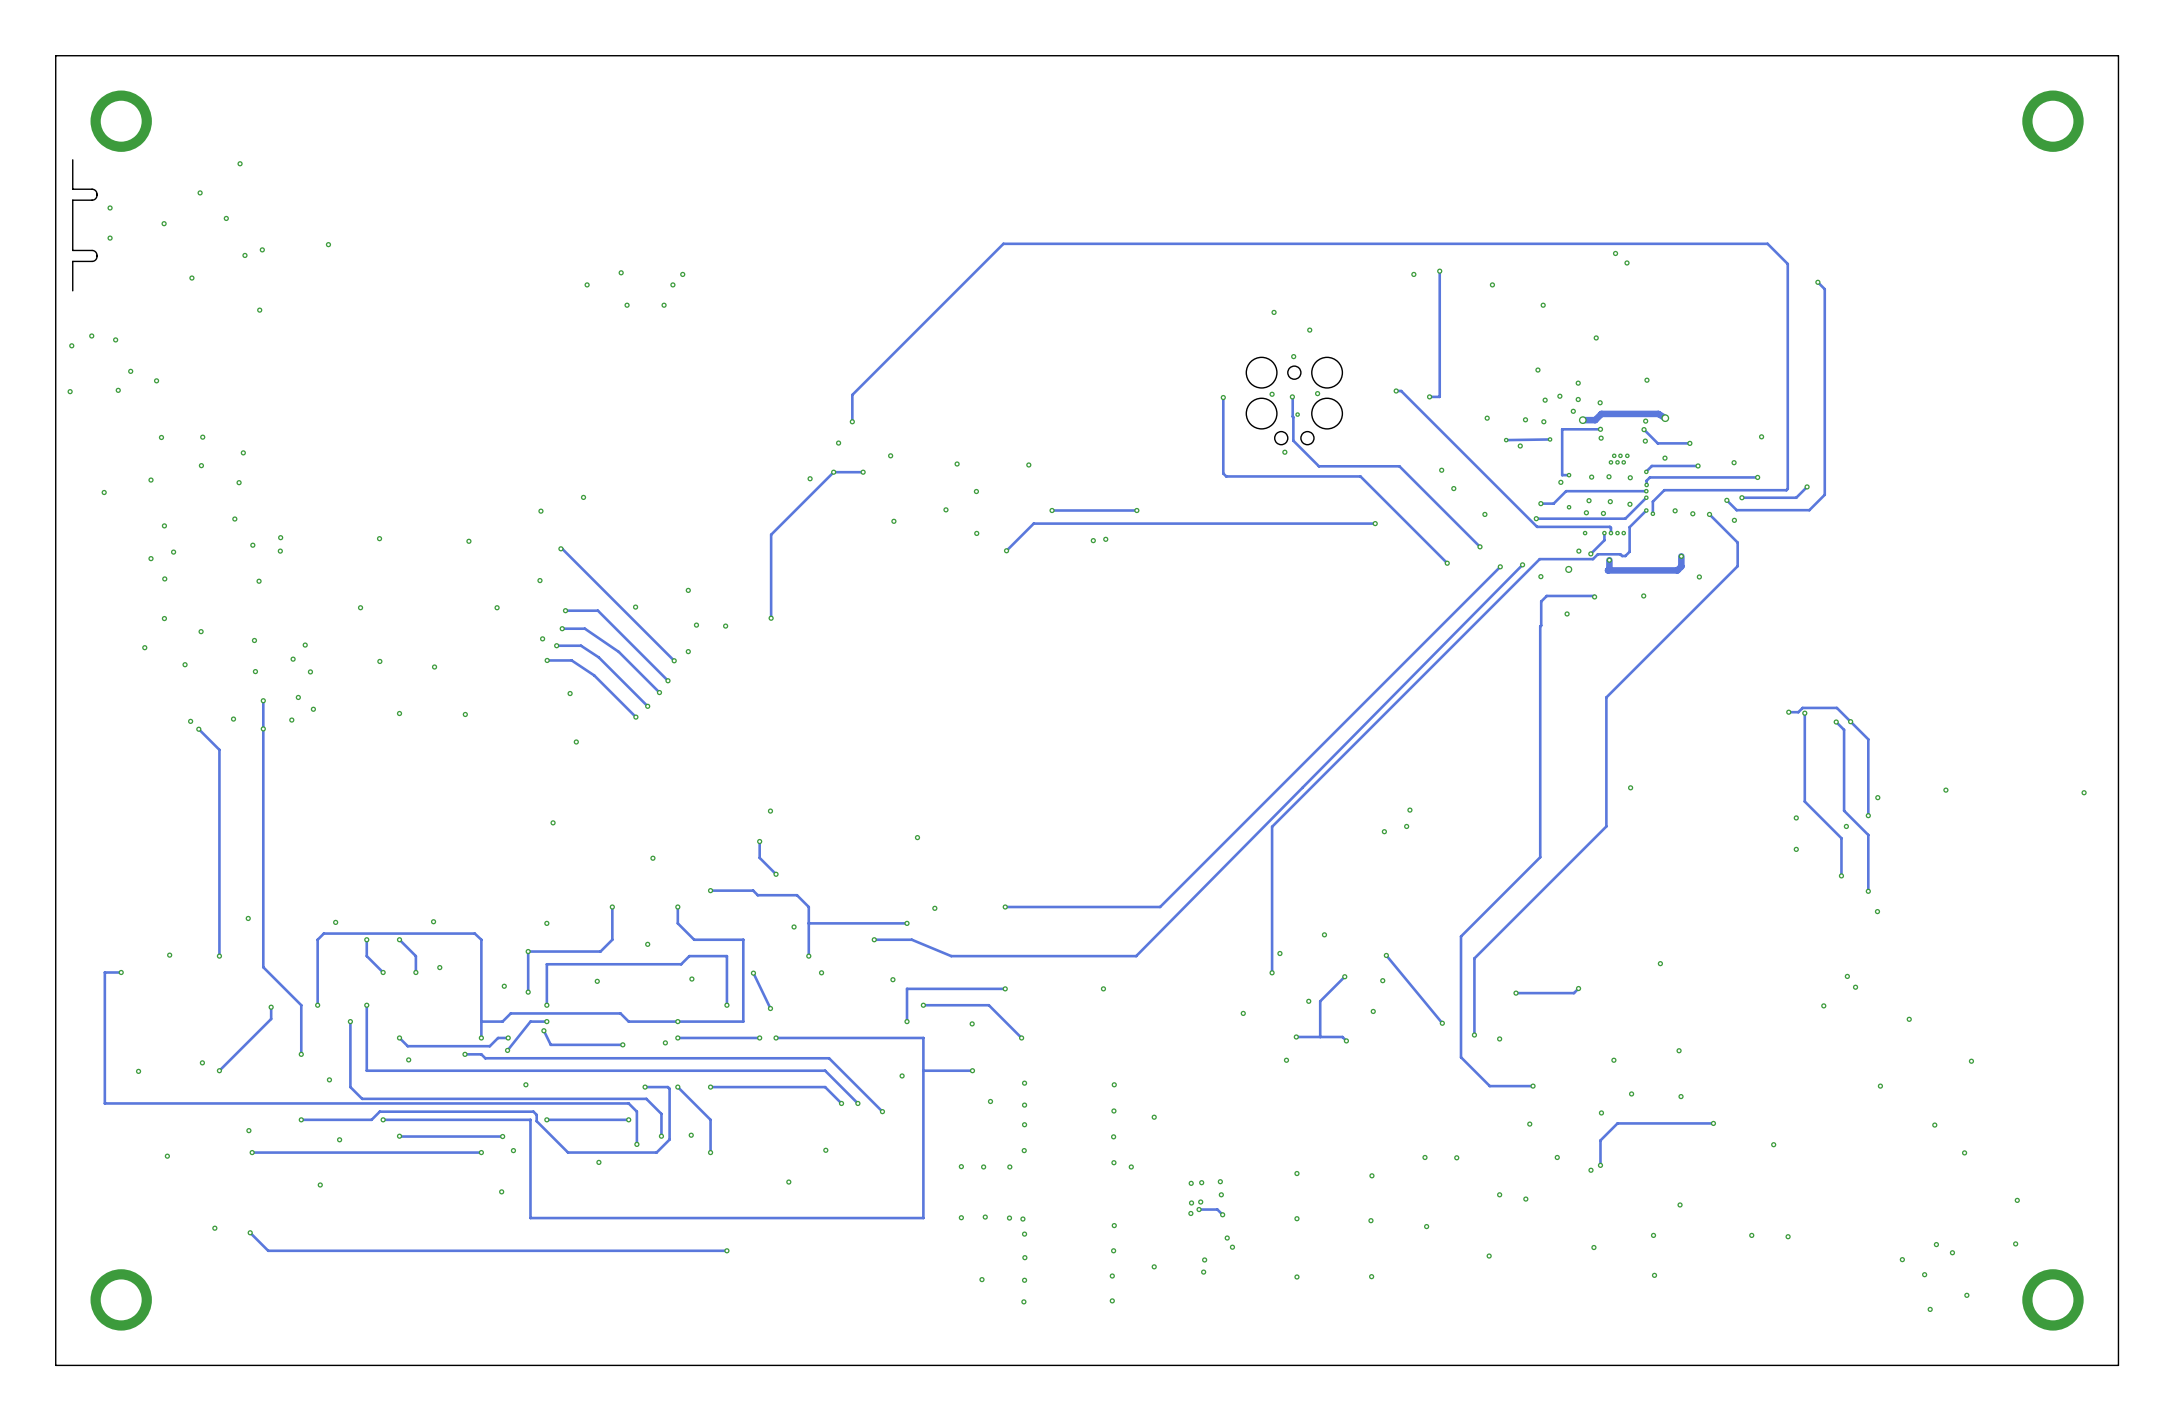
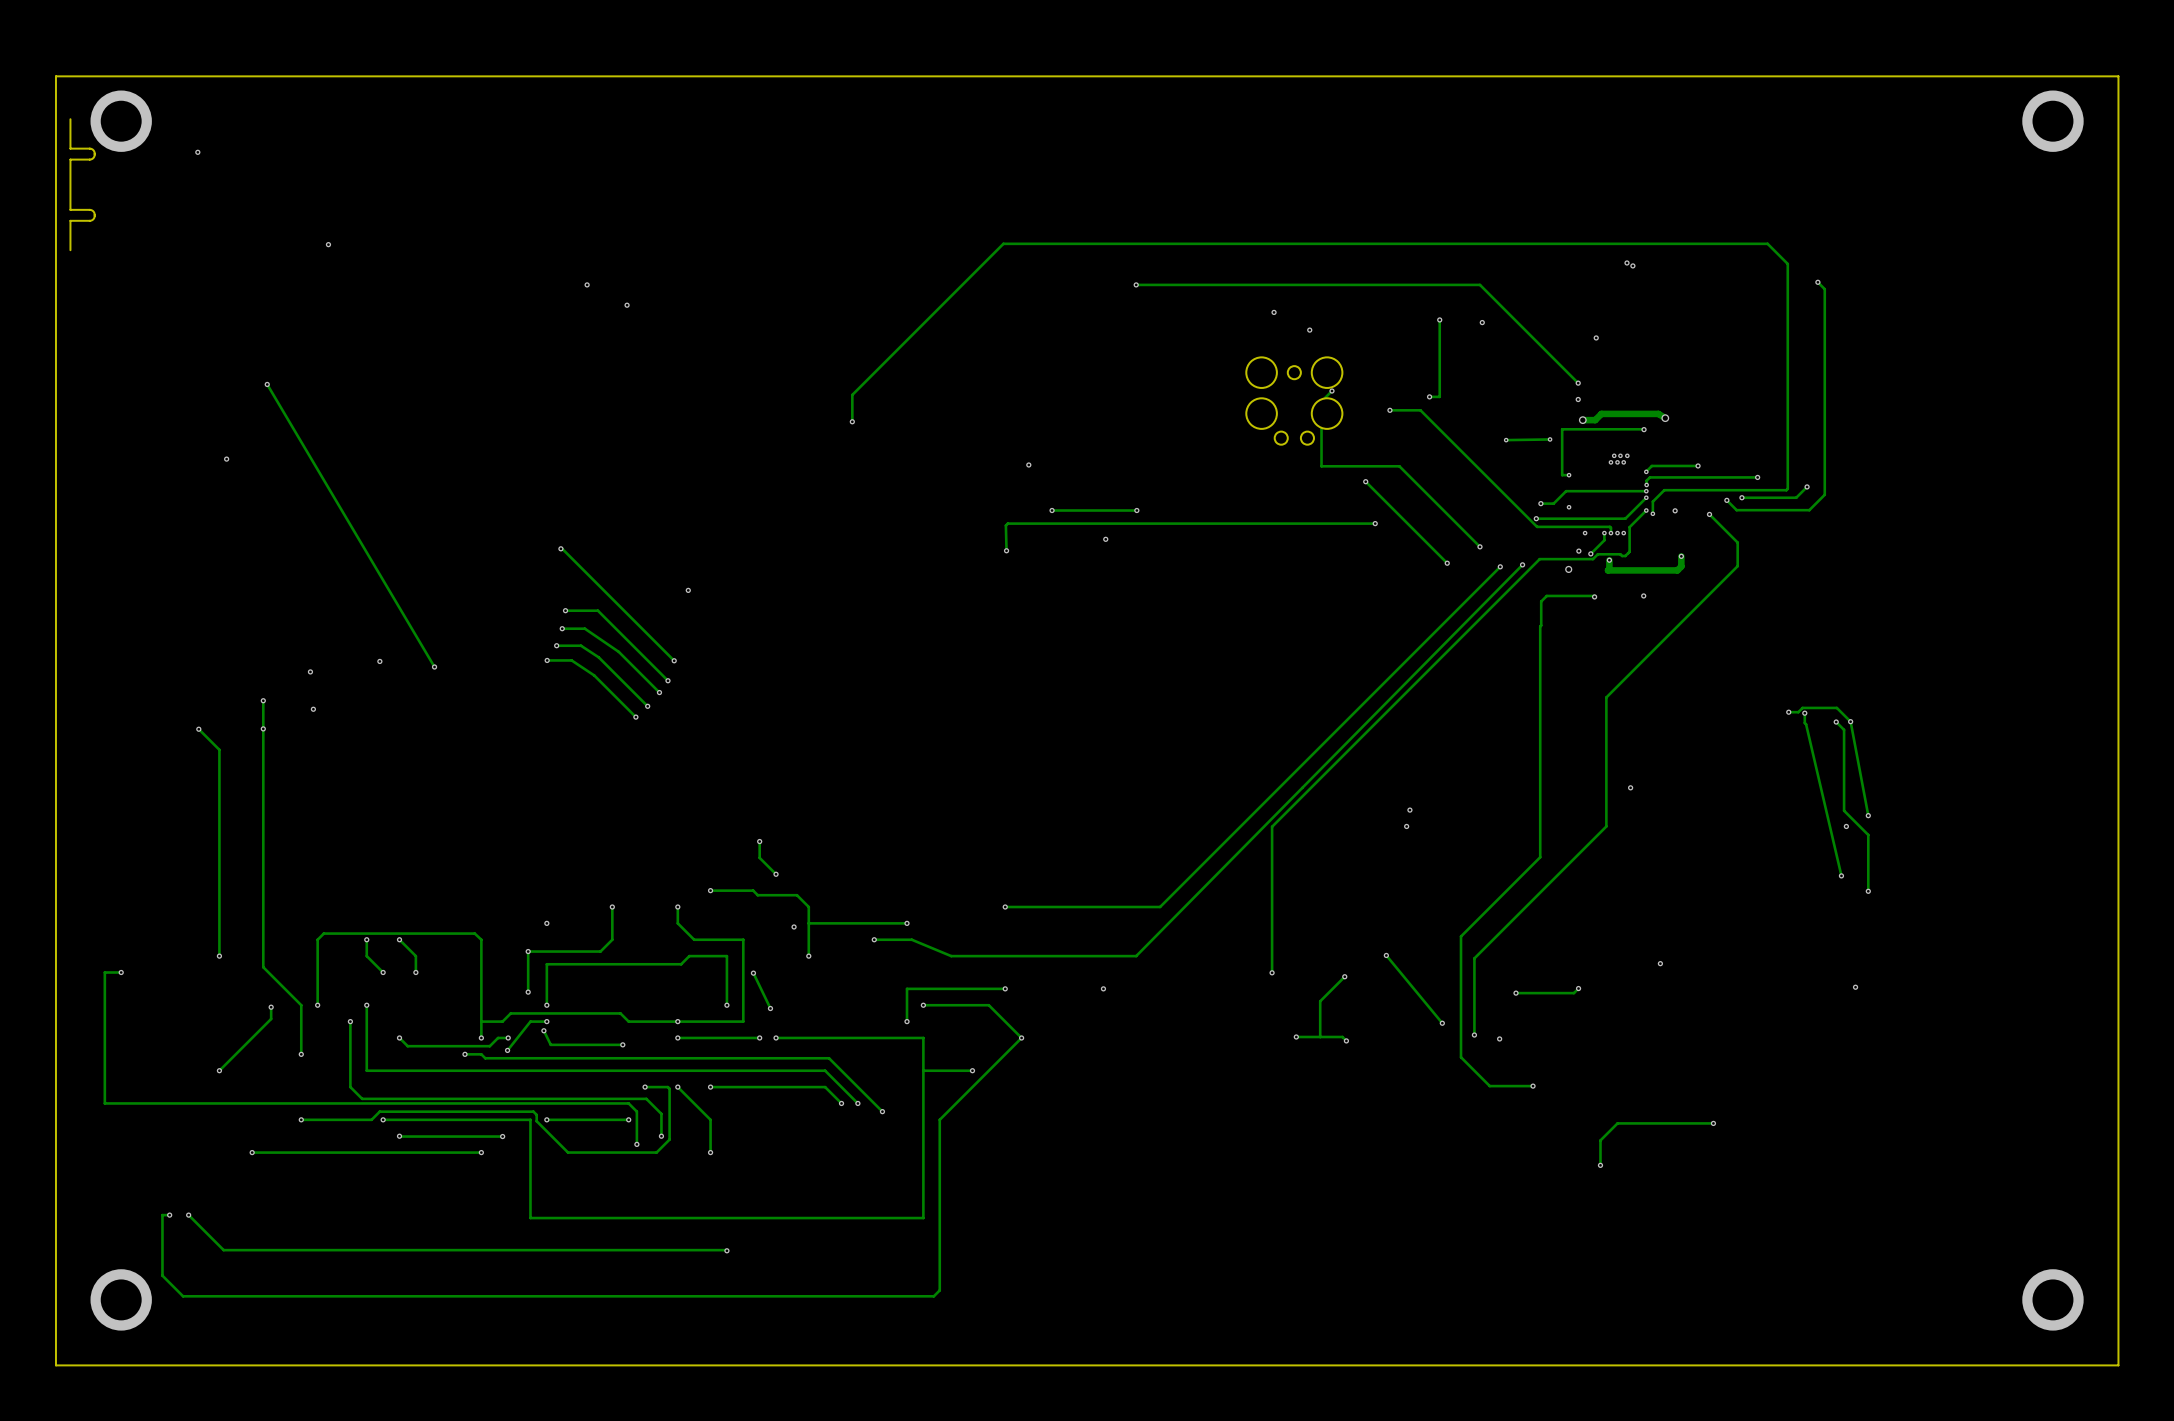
board edge: (2118, 76) (2118, 55) (55, 55) (55, 1365) -> (2118, 76) (55, 76) (55, 1365)
via: none -> (197, 152)
via: (240, 163) -> none
via: (200, 192) -> none
via: (110, 207) -> none
via: (226, 218) -> none
via: (164, 223) -> none
part position: (84, 225) -> (82, 184)
via: (110, 238) -> none
via: (262, 249) -> none
via position: (1615, 253) -> (1632, 265)
via: (244, 255) -> none
track: (1439, 271) (1439, 319) -> none
via: (1439, 271) -> none
via: (621, 272) -> none
via: (682, 274) -> none
via: (1413, 274) -> none
via: (191, 278) -> none
via: (672, 284) -> none
track: none -> (1136, 284) (1479, 284) (1578, 383)
via: none -> (1136, 284)
via: (1492, 284) -> none
via: (664, 305) -> none
via: (1543, 305) -> none
via: (259, 310) -> none
via: none -> (1439, 319)
via: none -> (1482, 322)
via: (91, 335) -> none
via: (115, 339) -> none
via: (71, 345) -> none
via: (1293, 356) -> none
via: (1537, 370) -> none
via: (130, 371) -> none
via: (156, 380) -> none
via: (1646, 380) -> none
track: none -> (267, 384) (434, 667)
via: none -> (267, 384)
via: (118, 390) -> none
via: (70, 391) -> none
track: (1396, 391) (1401, 391) (1420, 410) -> (1389, 410) (1420, 410)
via position: (1396, 391) -> (1389, 410)
via position: (1317, 393) -> (1332, 391)
via: (1272, 394) -> none
track: (1292, 396) (1293, 440) (1318, 466) (1321, 466) -> (1332, 391) (1321, 401) (1321, 466)
via: (1292, 396) -> none
via: (1559, 396) -> none
track: (1223, 397) (1223, 473) (1226, 476) (1360, 476) (1365, 481) -> none
via: (1223, 397) -> none
via: (1545, 400) -> none
via: (1600, 402) -> none
via: (1573, 411) -> none
via: (1297, 414) -> none
via: (1487, 418) -> none
via: (1525, 419) -> none
via: (1543, 421) -> none
via: (1645, 421) -> none
via: (1600, 429) -> none
track: (1644, 429) (1657, 443) (1689, 443) -> (1643, 429) (1600, 429)
via: (1761, 436) -> none
via: (161, 437) -> none
via: (202, 437) -> none
via: (1601, 438) -> none
via: (1645, 441) -> none
via: (838, 443) -> none
via: (1689, 443) -> none
via: (1520, 446) -> none
via: (243, 452) -> none
via: (1284, 452) -> none
via: (890, 455) -> none
via: (1664, 458) -> none
via: none -> (226, 459)
via: (1734, 462) -> none
via: (957, 464) -> none
via: (201, 465) -> none
via: (1441, 470) -> none
via: (833, 472) -> none
track: (863, 472) (833, 472) (771, 534) (771, 618) -> none
via: (863, 472) -> none
via: (1608, 476) -> none
via: (1591, 477) -> none
via: (1630, 477) -> none
via: (810, 478) -> none
via: (151, 480) -> none
via: none -> (1365, 481)
via: (239, 482) -> none
via: (1560, 482) -> none
via: (1453, 488) -> none
via: (976, 491) -> none
via: (104, 492) -> none
via: (583, 497) -> none
via: (1589, 500) -> none
via: (1610, 501) -> none
via: (1629, 504) -> none
via: (945, 509) -> none
via: (540, 511) -> none
via: (1586, 512) -> none
via: (1603, 513) -> none
via: (1692, 513) -> none
via: (1484, 514) -> none
via: (234, 519) -> none
via: (1734, 520) -> none
via: (893, 521) -> none
track: (1033, 523) (1006, 550) -> (1033, 523) (1007, 523) (1005, 525) (1006, 550)
via: (164, 525) -> none
via: (976, 533) -> none
via: (280, 537) -> none
via: (379, 538) -> none
via: (1093, 540) -> none
via: (468, 541) -> none
via: (252, 545) -> none
via: (280, 551) -> none
via: (173, 552) -> none
via: (151, 558) -> none
via: (1540, 576) -> none
via: (1699, 576) -> none
via: (164, 578) -> none
via: (539, 580) -> none
via: (259, 581) -> none
via: (360, 607) -> none
via: (497, 607) -> none
via: (635, 607) -> none
via: (1567, 613) -> none
via: (164, 618) -> none
via: (771, 618) -> none
via: (696, 625) -> none
via: (725, 626) -> none
via: (201, 631) -> none
via: (542, 638) -> none
via: (254, 640) -> none
via: (305, 645) -> none
via: (144, 647) -> none
via: (688, 651) -> none
via: (293, 659) -> none
via: (185, 664) -> none
via: (255, 671) -> none
via: (570, 693) -> none
via: (298, 697) -> none
via: (399, 713) -> none
via: (465, 714) -> none
via: (233, 719) -> none
via: (291, 720) -> none
via: (190, 721) -> none
track: (1850, 721) (1868, 739) (1868, 815) -> (1850, 721) (1868, 815)
track: (1804, 723) (1804, 801) (1841, 838) (1841, 875) -> (1804, 723) (1841, 875)
via: (576, 741) -> none
via: (1945, 790) -> none
via: (2084, 792) -> none
via: (1877, 797) -> none
via: (770, 811) -> none
via: (1796, 817) -> none
via: (553, 822) -> none
via: (1384, 831) -> none
via: (917, 837) -> none
via: (1796, 849) -> none
via: (652, 858) -> none
via: (934, 908) -> none
via: (1877, 911) -> none
via: (248, 918) -> none
via: (433, 921) -> none
via: (335, 922) -> none
via: (1324, 934) -> none
via: (647, 944) -> none
via: (1279, 953) -> none
via: (169, 955) -> none
via: (439, 967) -> none
via: (821, 972) -> none
via: (1847, 976) -> none
via: (691, 979) -> none
via: (892, 979) -> none
via: (1382, 980) -> none
via: (597, 981) -> none
via: (504, 986) -> none
via: (1308, 1001) -> none
via: (1823, 1005) -> none
via: (1373, 1011) -> none
via: (1243, 1013) -> none
via: (1909, 1019) -> none
via: (972, 1023) -> none
track: none -> (1021, 1037) (939, 1119) (939, 1290) (933, 1296) (183, 1296) (162, 1275) (162, 1215) (169, 1215)
via: (665, 1042) -> none
via: (1679, 1050) -> none
via: (408, 1059) -> none
via: (1286, 1060) -> none
via: (1613, 1060) -> none
via: (1971, 1061) -> none
via: (202, 1062) -> none
via: (138, 1071) -> none
via: (902, 1075) -> none
via: (329, 1079) -> none
via: (1024, 1083) -> none
via: (525, 1084) -> none
via: (1114, 1084) -> none
via: (1880, 1086) -> none
via: (1631, 1093) -> none
via: (1681, 1096) -> none
via: (990, 1101) -> none
via: (1024, 1105) -> none
via: (1113, 1110) -> none
via: (1601, 1112) -> none
via: (1154, 1117) -> none
via: (1024, 1124) -> none
via: (1529, 1124) -> none
via: (1934, 1125) -> none
via: (248, 1130) -> none
via: (691, 1135) -> none
via: (1113, 1136) -> none
via: (339, 1139) -> none
via: (1773, 1144) -> none
via: (513, 1150) -> none
via: (825, 1150) -> none
via: (1024, 1150) -> none
via: (1964, 1152) -> none
via: (167, 1156) -> none
via: (1424, 1157) -> none
via: (1456, 1157) -> none
via: (1557, 1157) -> none
via: (598, 1162) -> none
via: (1113, 1162) -> none
via: (961, 1166) -> none
via: (983, 1166) -> none
via: (1009, 1166) -> none
via: (1131, 1166) -> none
via: (1590, 1170) -> none
via: (1296, 1173) -> none
via: (1371, 1175) -> none
via: (1220, 1181) -> none
via: (788, 1182) -> none
via: (1201, 1182) -> none
via: (1191, 1183) -> none
via: (320, 1184) -> none
via: (501, 1191) -> none
via: (1221, 1194) -> none
via: (1499, 1194) -> none
via: (1525, 1199) -> none
via: (2017, 1200) -> none
via: (1191, 1202) -> none
via: (1200, 1202) -> none
via: (1680, 1204) -> none
track: (1199, 1209) (1217, 1209) (1222, 1214) -> none
via: (1199, 1209) -> none
via: (1190, 1213) -> none
via: (1222, 1214) -> none
via: none -> (169, 1215)
via: none -> (188, 1215)
via: (961, 1217) -> none
via: (985, 1217) -> none
via: (1009, 1218) -> none
via: (1296, 1218) -> none
via: (1022, 1219) -> none
via: (1370, 1220) -> none
via: (1114, 1225) -> none
via: (1426, 1226) -> none
via: (214, 1228) -> none
track: (250, 1232) (268, 1250) (726, 1250) -> (188, 1215) (223, 1250) (726, 1250)
via: (250, 1232) -> none
via: (1024, 1234) -> none
via: (1653, 1235) -> none
via: (1751, 1235) -> none
via: (1788, 1236) -> none
via: (1227, 1238) -> none
via: (2015, 1243) -> none
via: (1936, 1244) -> none
via: (1232, 1247) -> none
via: (1593, 1247) -> none
via: (1113, 1250) -> none
via: (1952, 1252) -> none
via: (1489, 1256) -> none
via: (1024, 1257) -> none
via: (1204, 1259) -> none
via: (1902, 1259) -> none
via: (1154, 1266) -> none
via: (1203, 1272) -> none
via: (1924, 1274) -> none
via: (1654, 1275) -> none
via: (1112, 1276) -> none
via: (1296, 1276) -> none
via: (1371, 1276) -> none
via: (981, 1279) -> none
via: (1024, 1280) -> none
via: (1966, 1295) -> none
via: (1112, 1300) -> none
via: (1023, 1301) -> none
via: (1930, 1309) -> none

